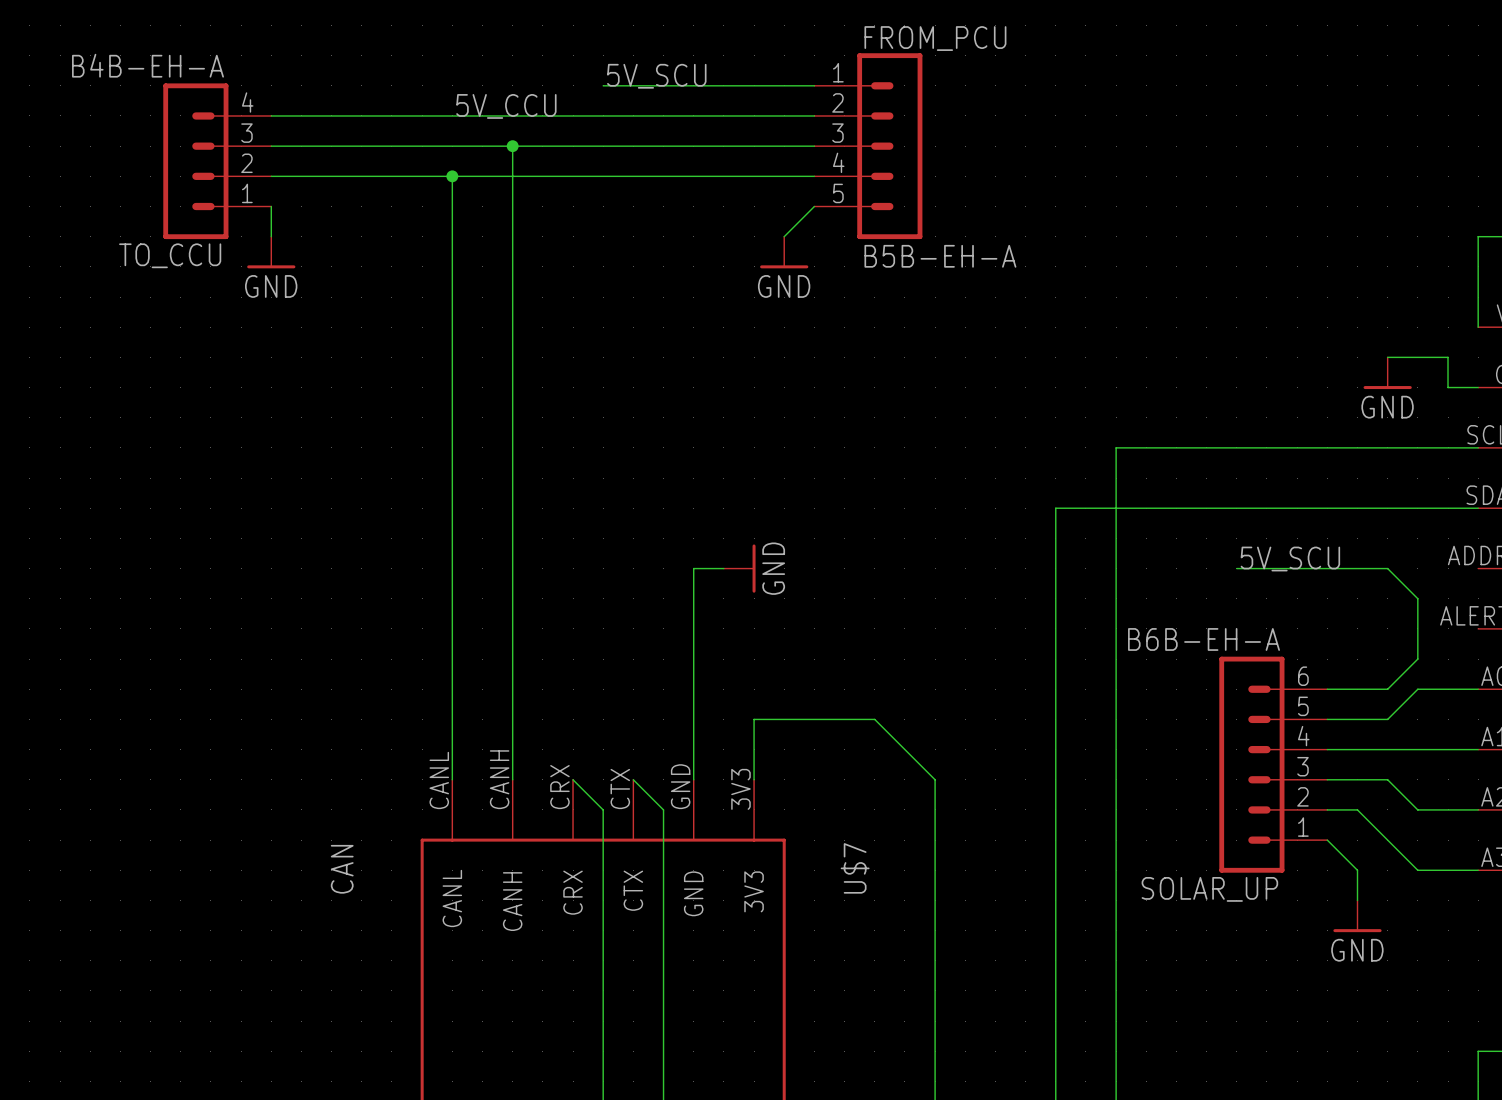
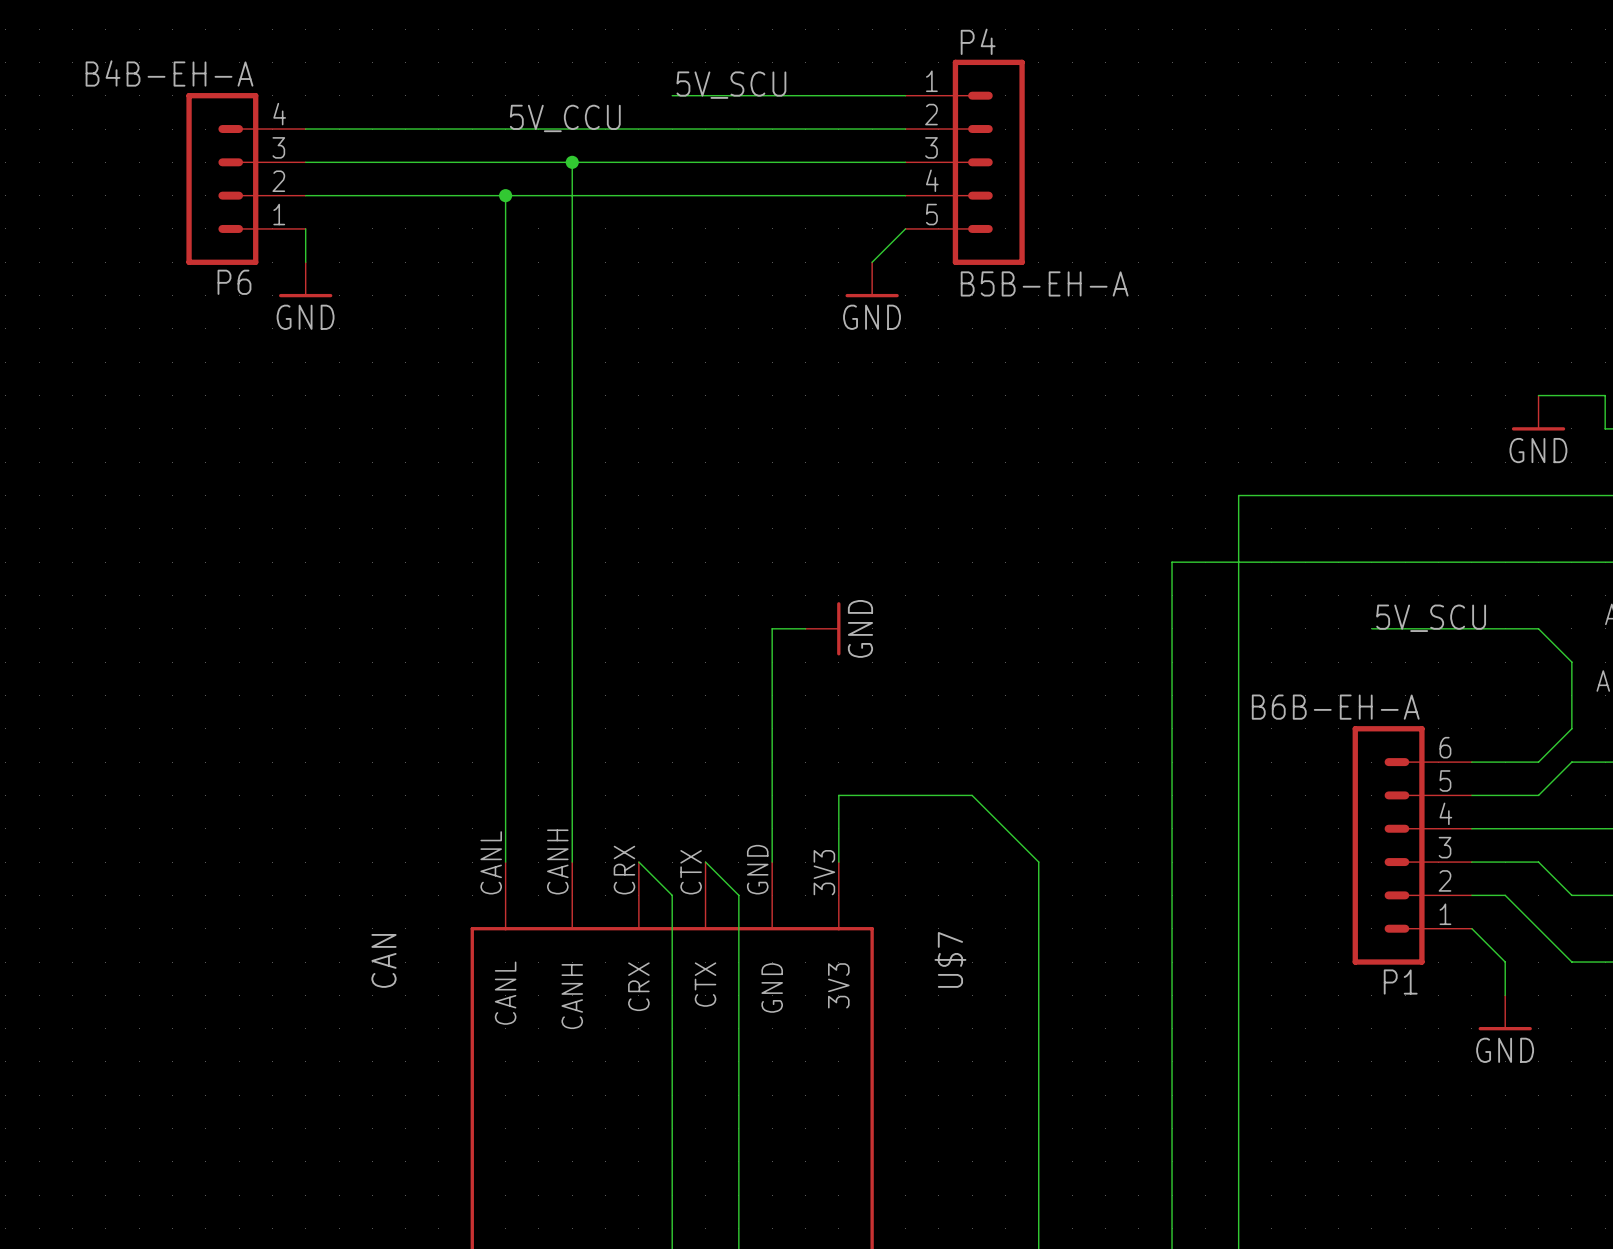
FROM_PCU name: FROM_PCU (935, 38) -> P4 (978, 41)
TO_CCU name: TO_CCU (170, 255) -> P6 (234, 282)
SOLAR_UP name: SOLAR_UP (1209, 889) -> P1 (1400, 982)

